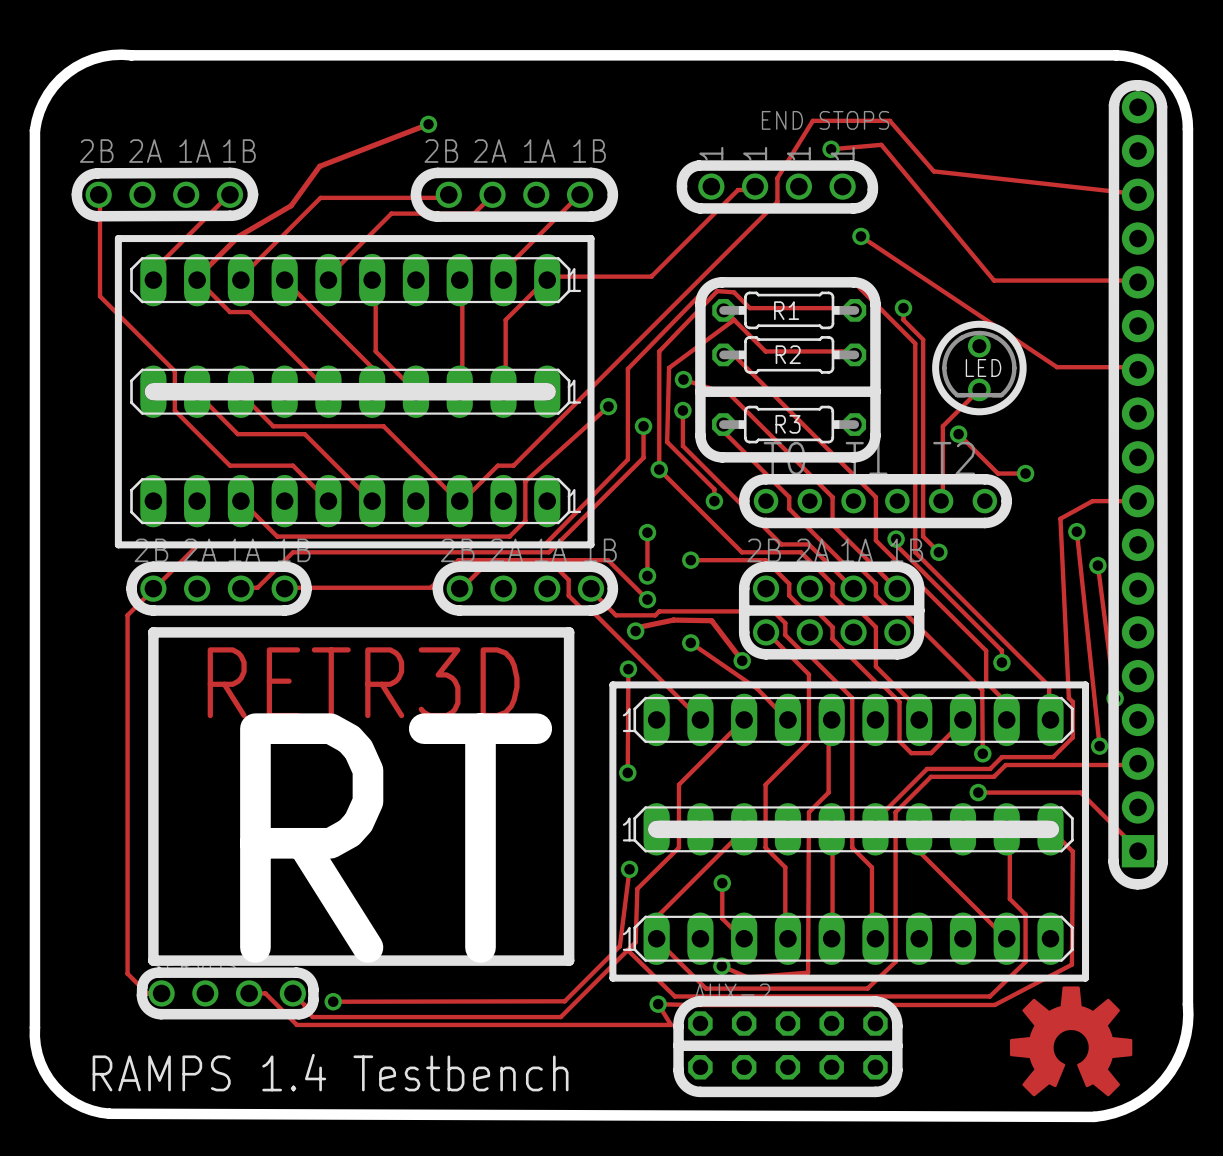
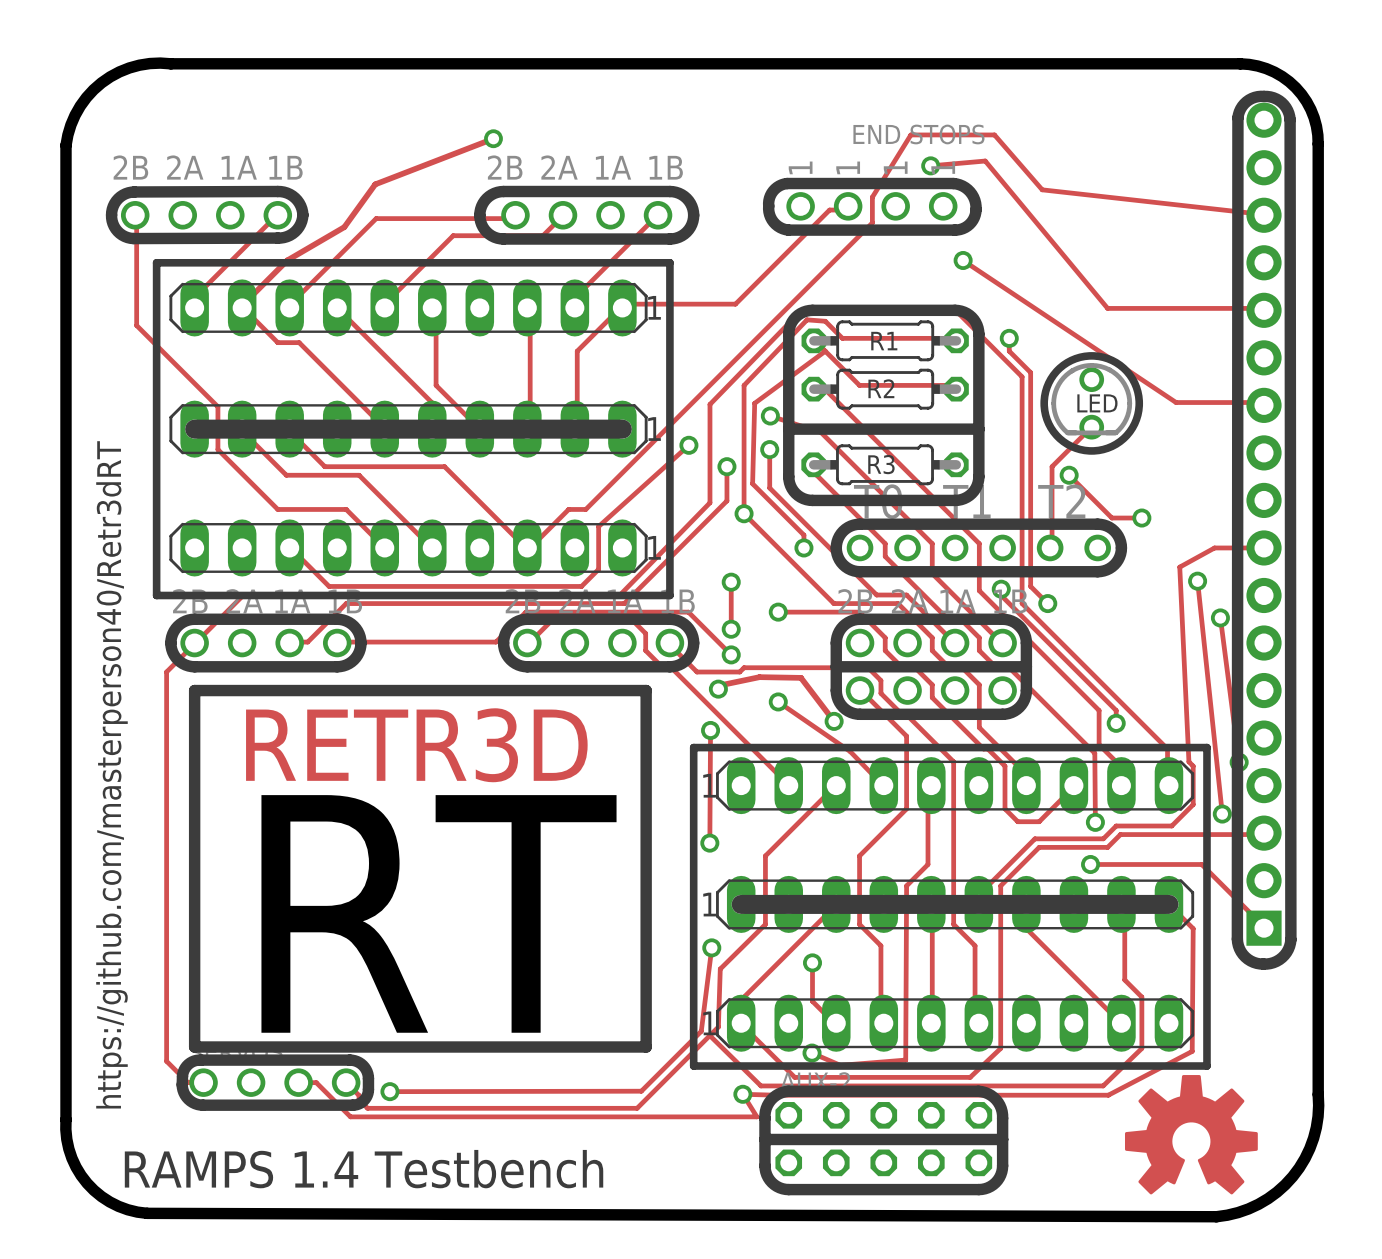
text: none -> https://github.com/masterperson40/Retr3dRT (111, 774)

